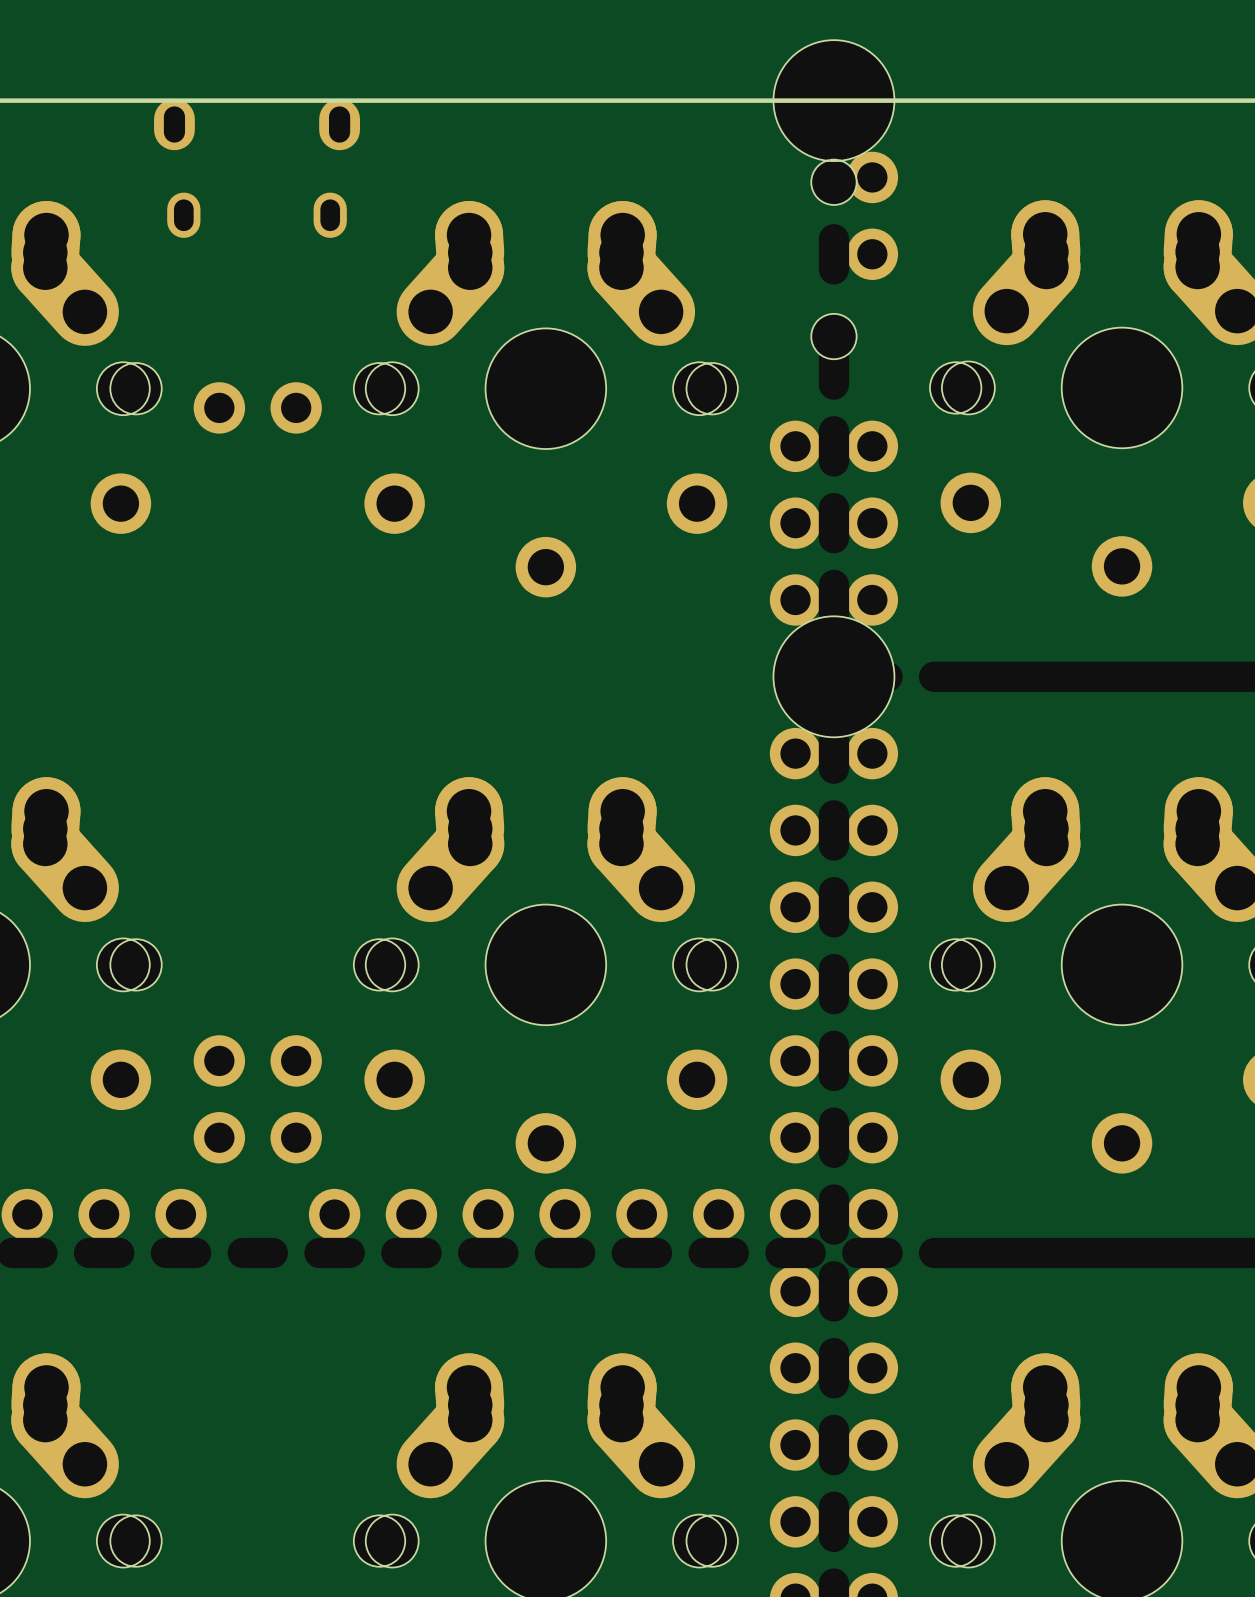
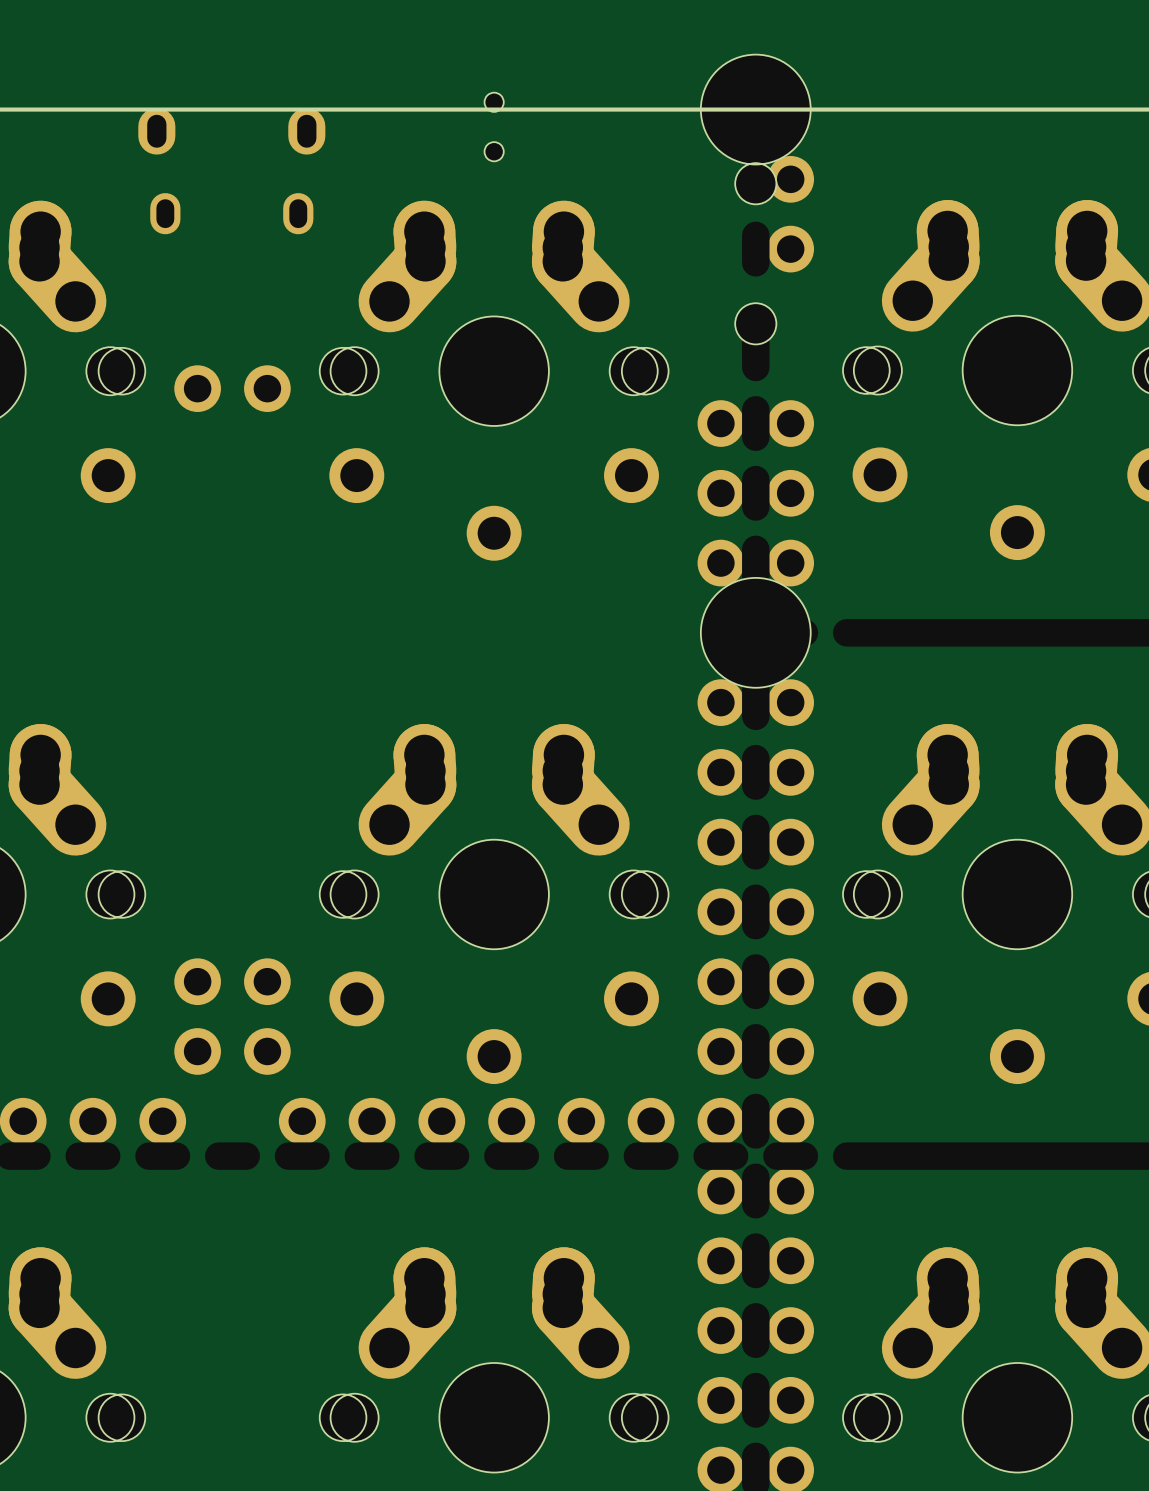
part: none -> (494, 127)

